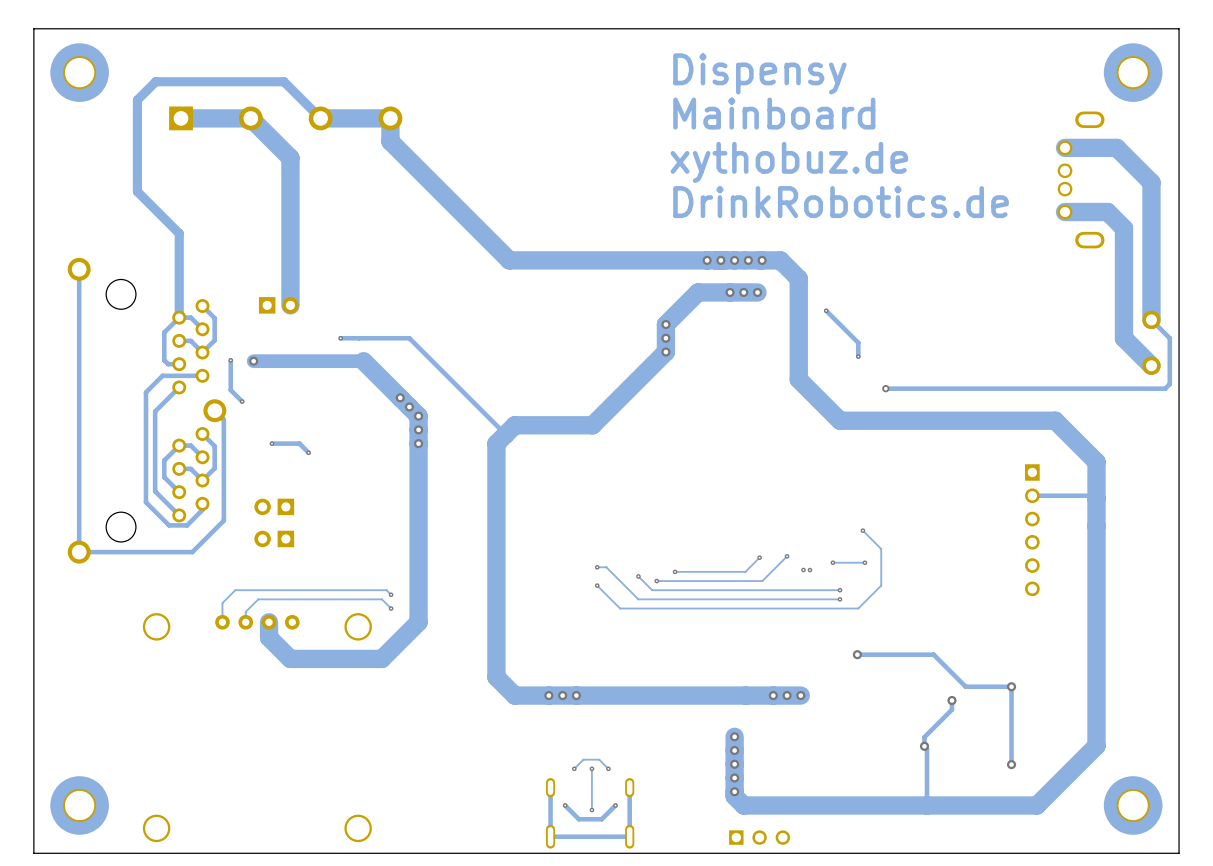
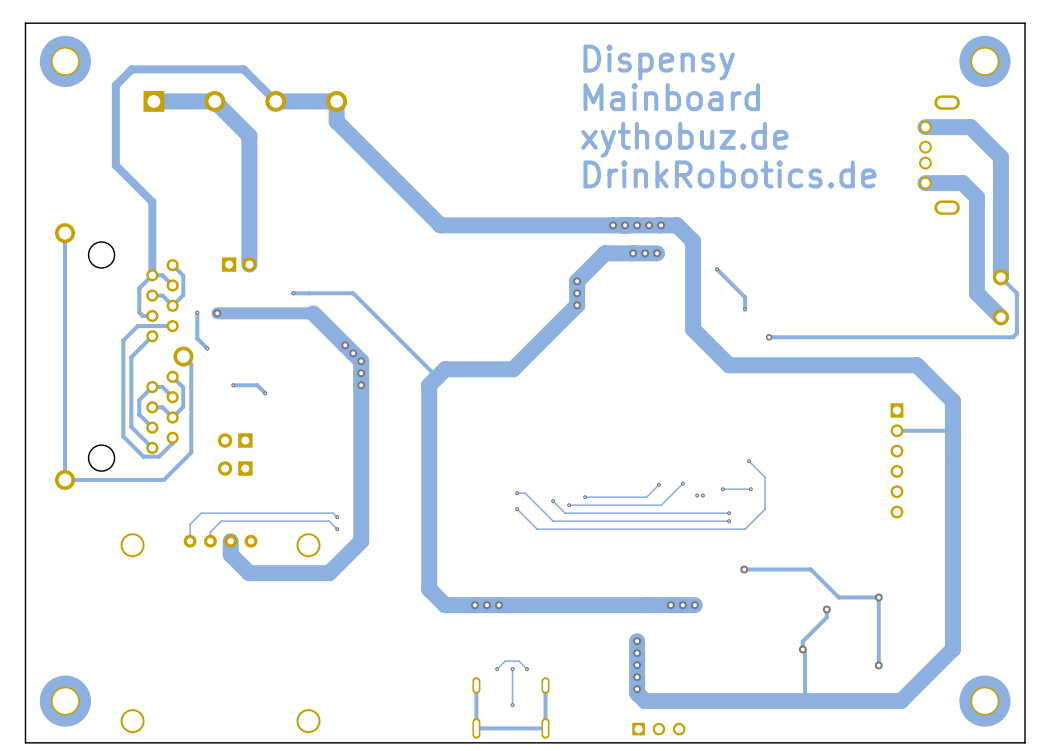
via: (565, 805) -> none
track: (615, 805) (601, 819) (578, 819) (565, 805) -> none
via: (615, 805) -> none

